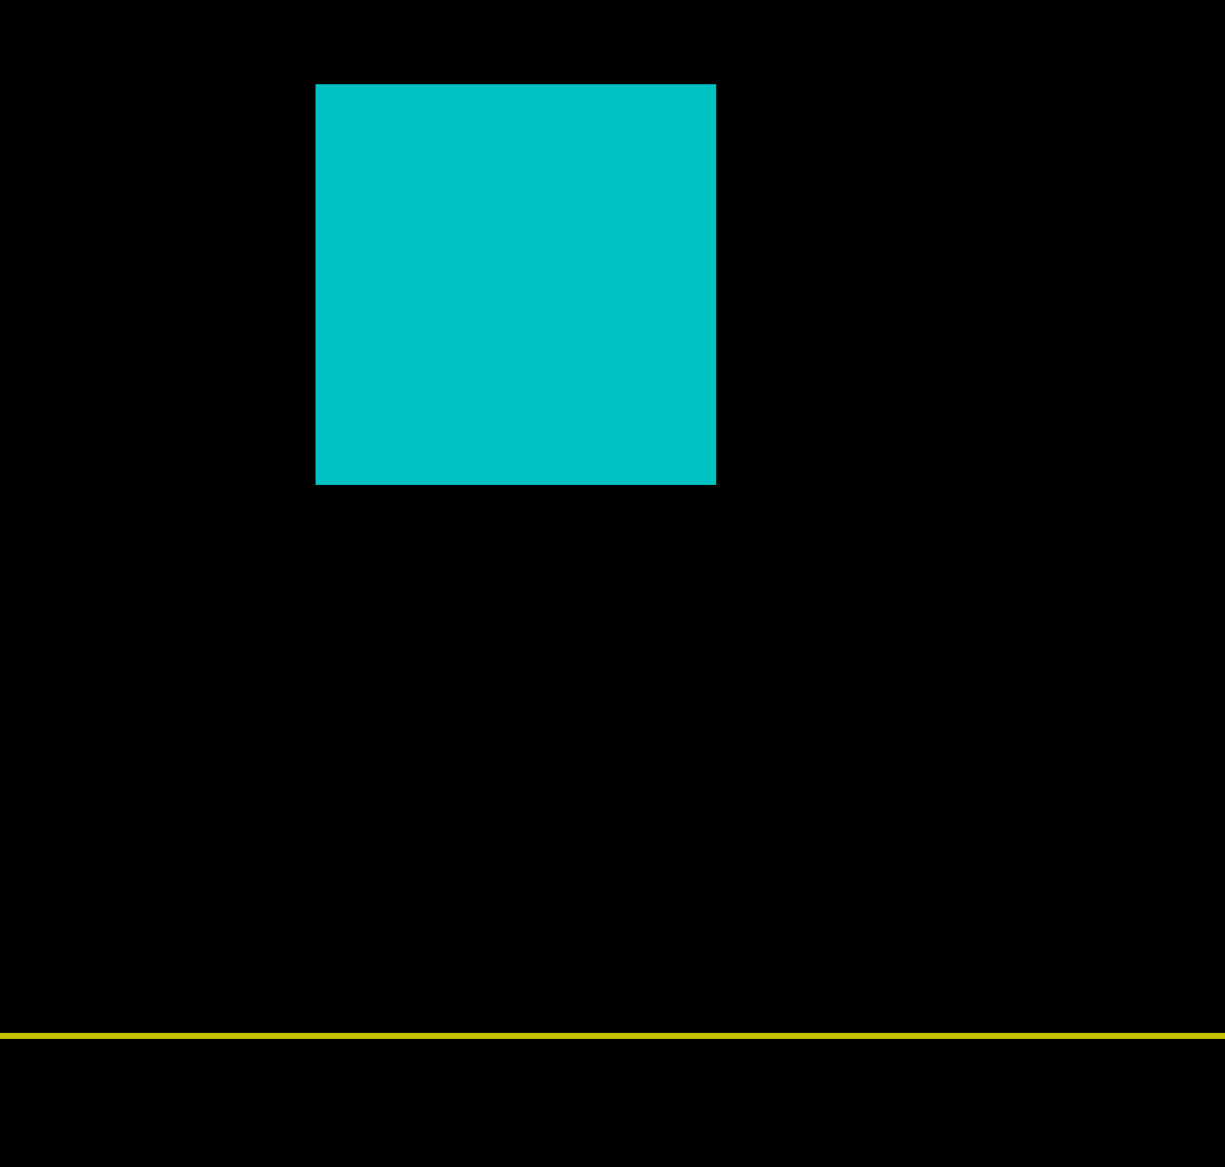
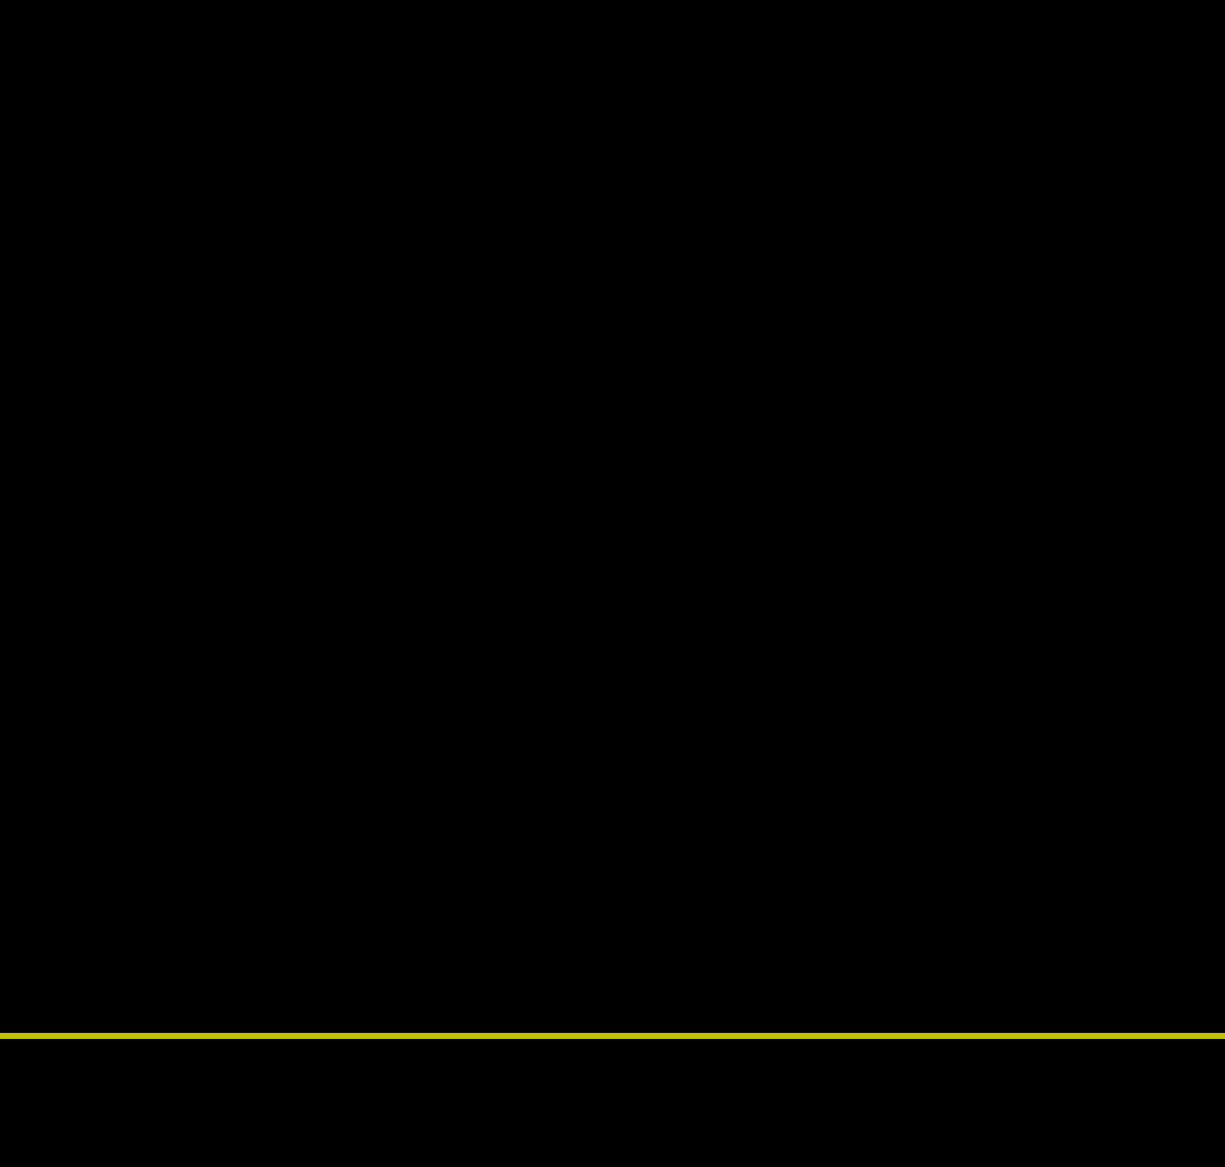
drawing: [315, 84, 717, 485] -> none

